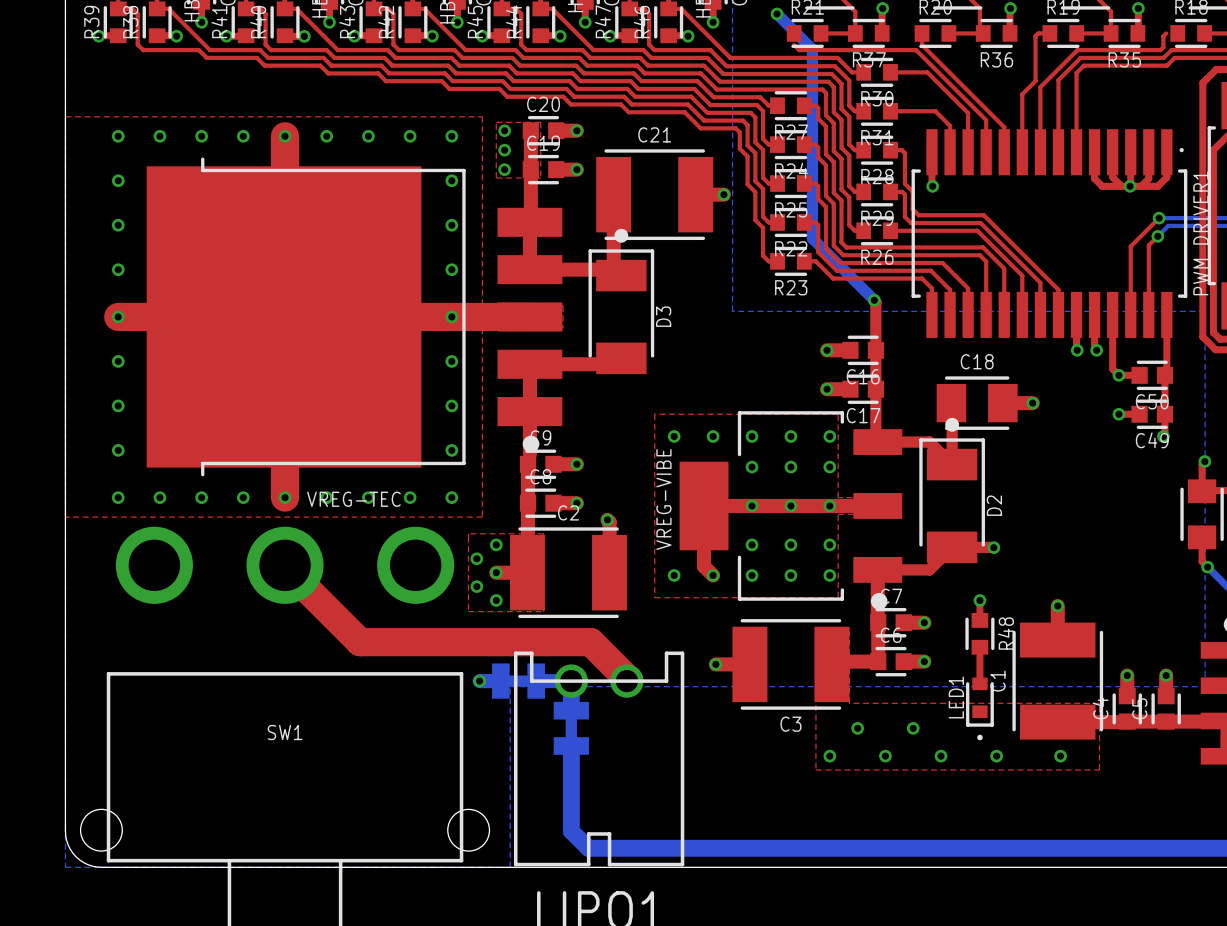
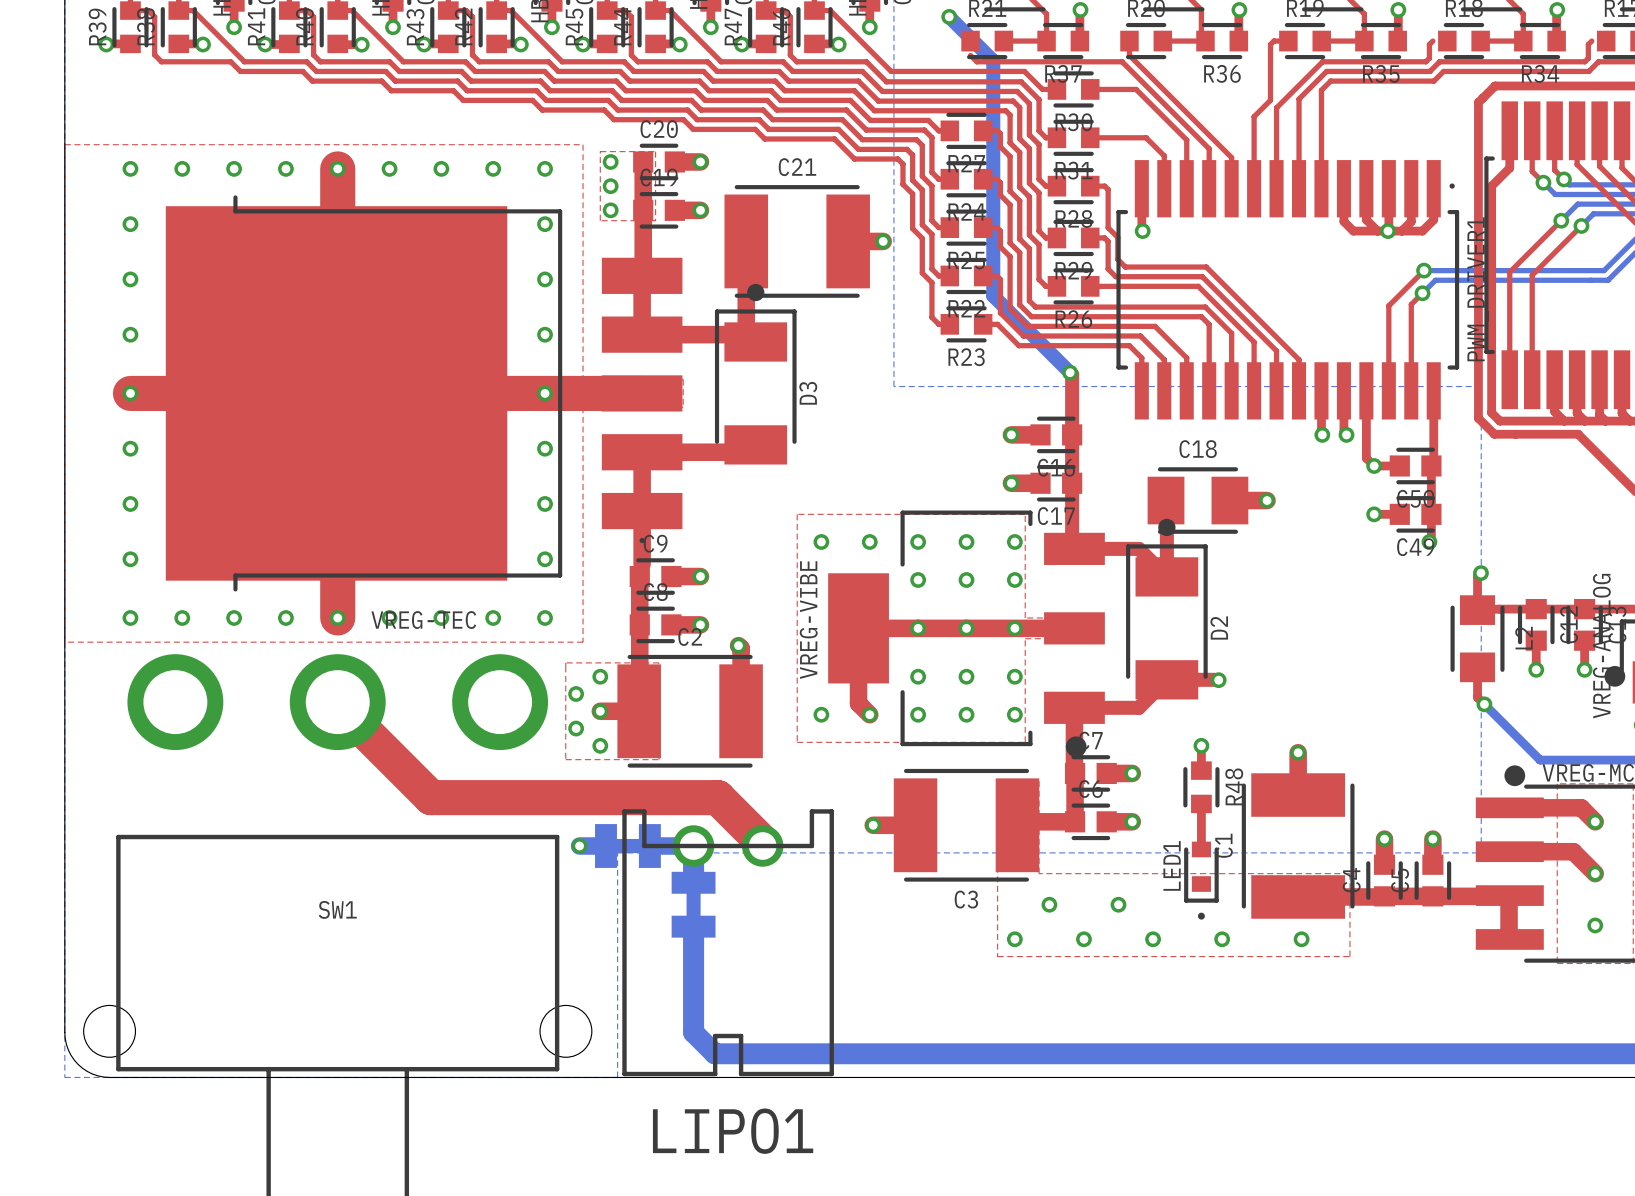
VREG-TEC footprint: [146, 157, 563, 477] -> [165, 195, 683, 592]

